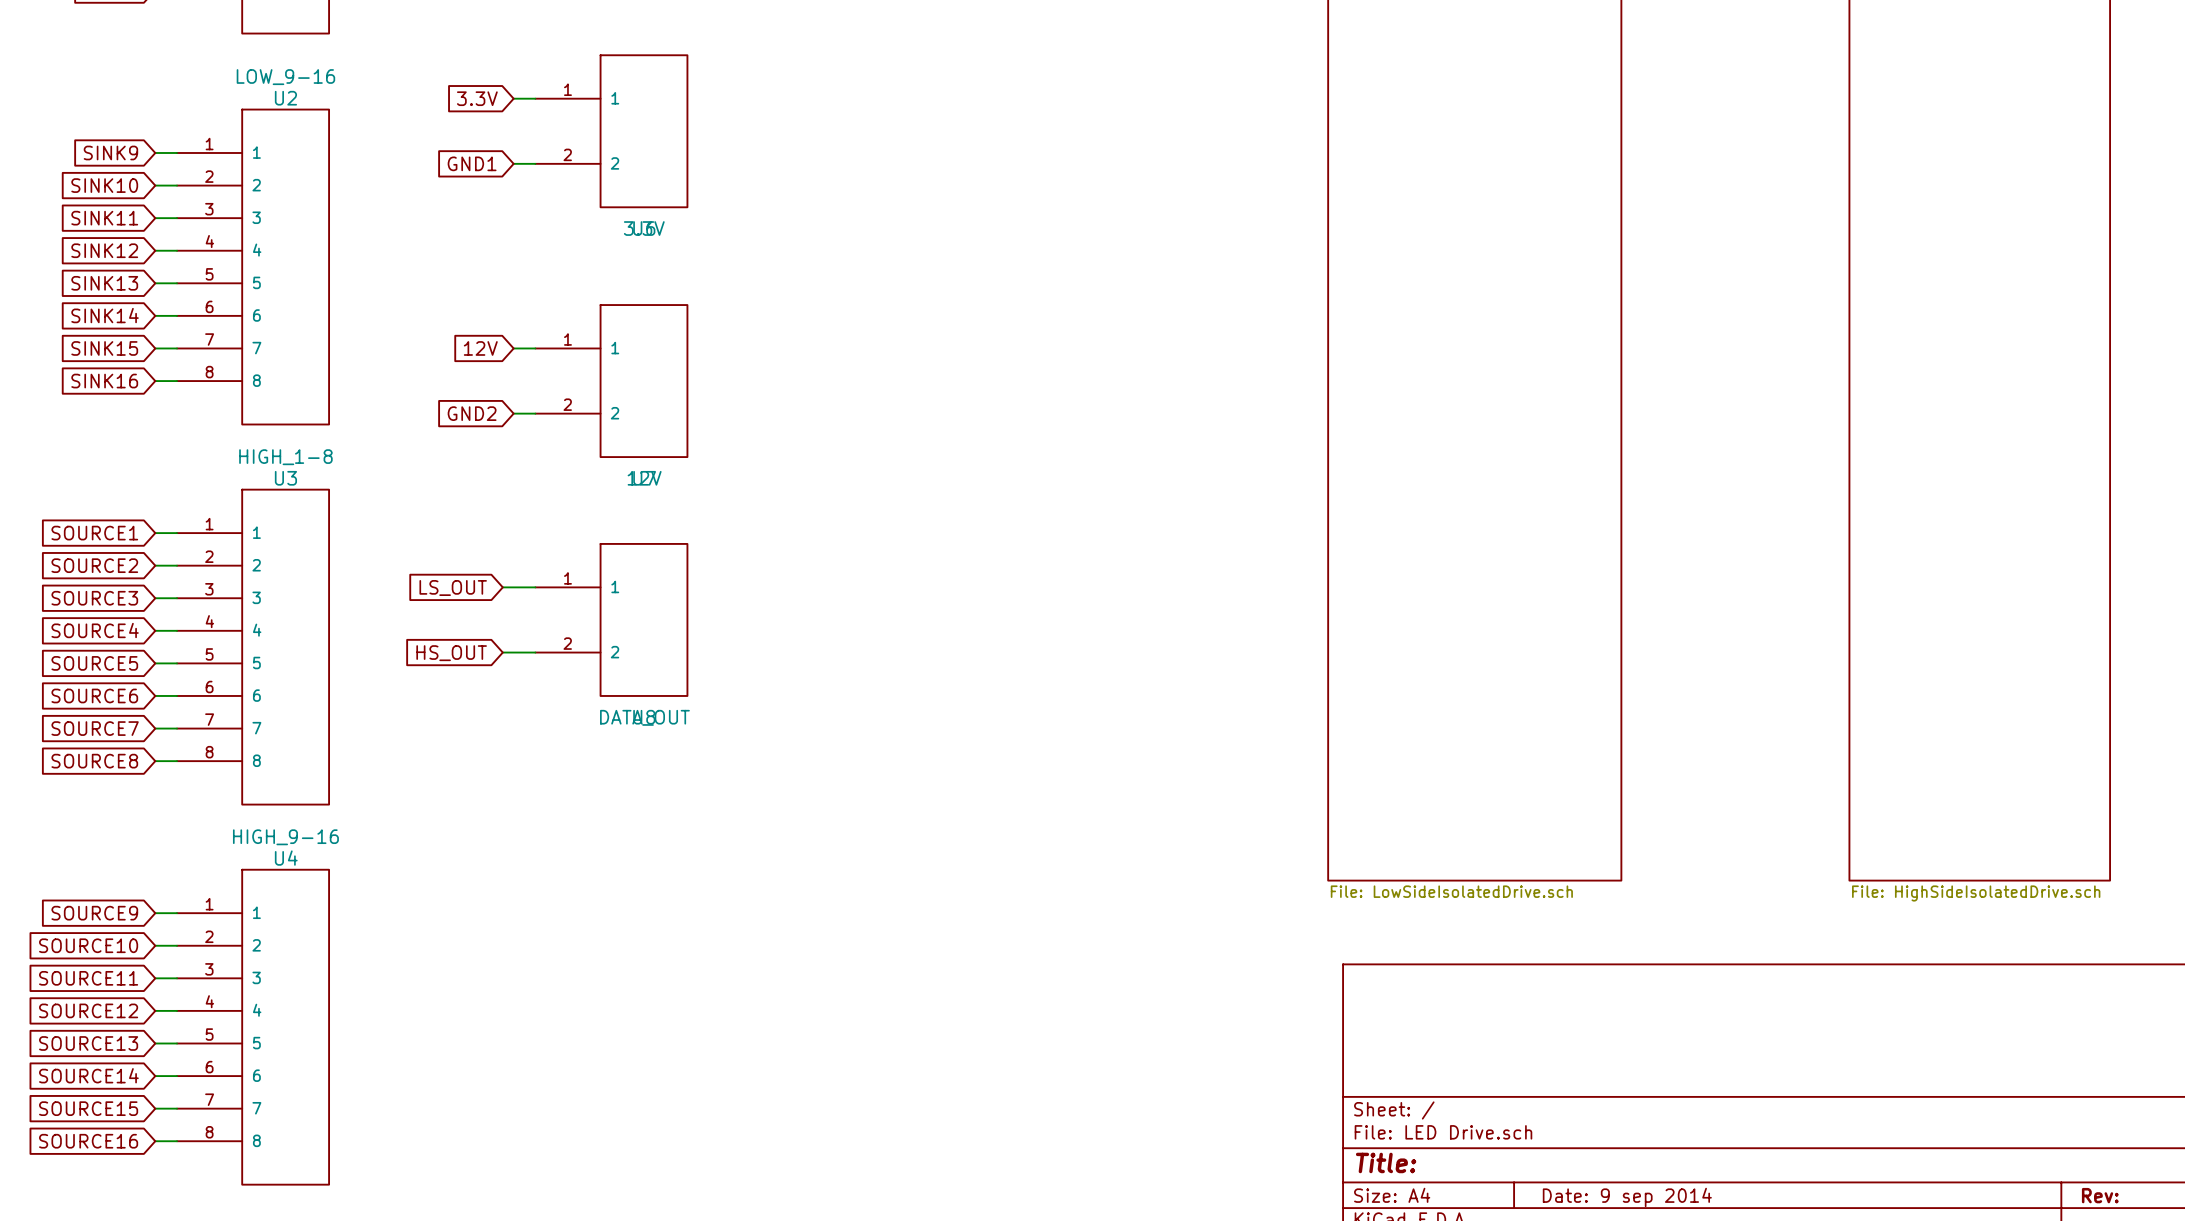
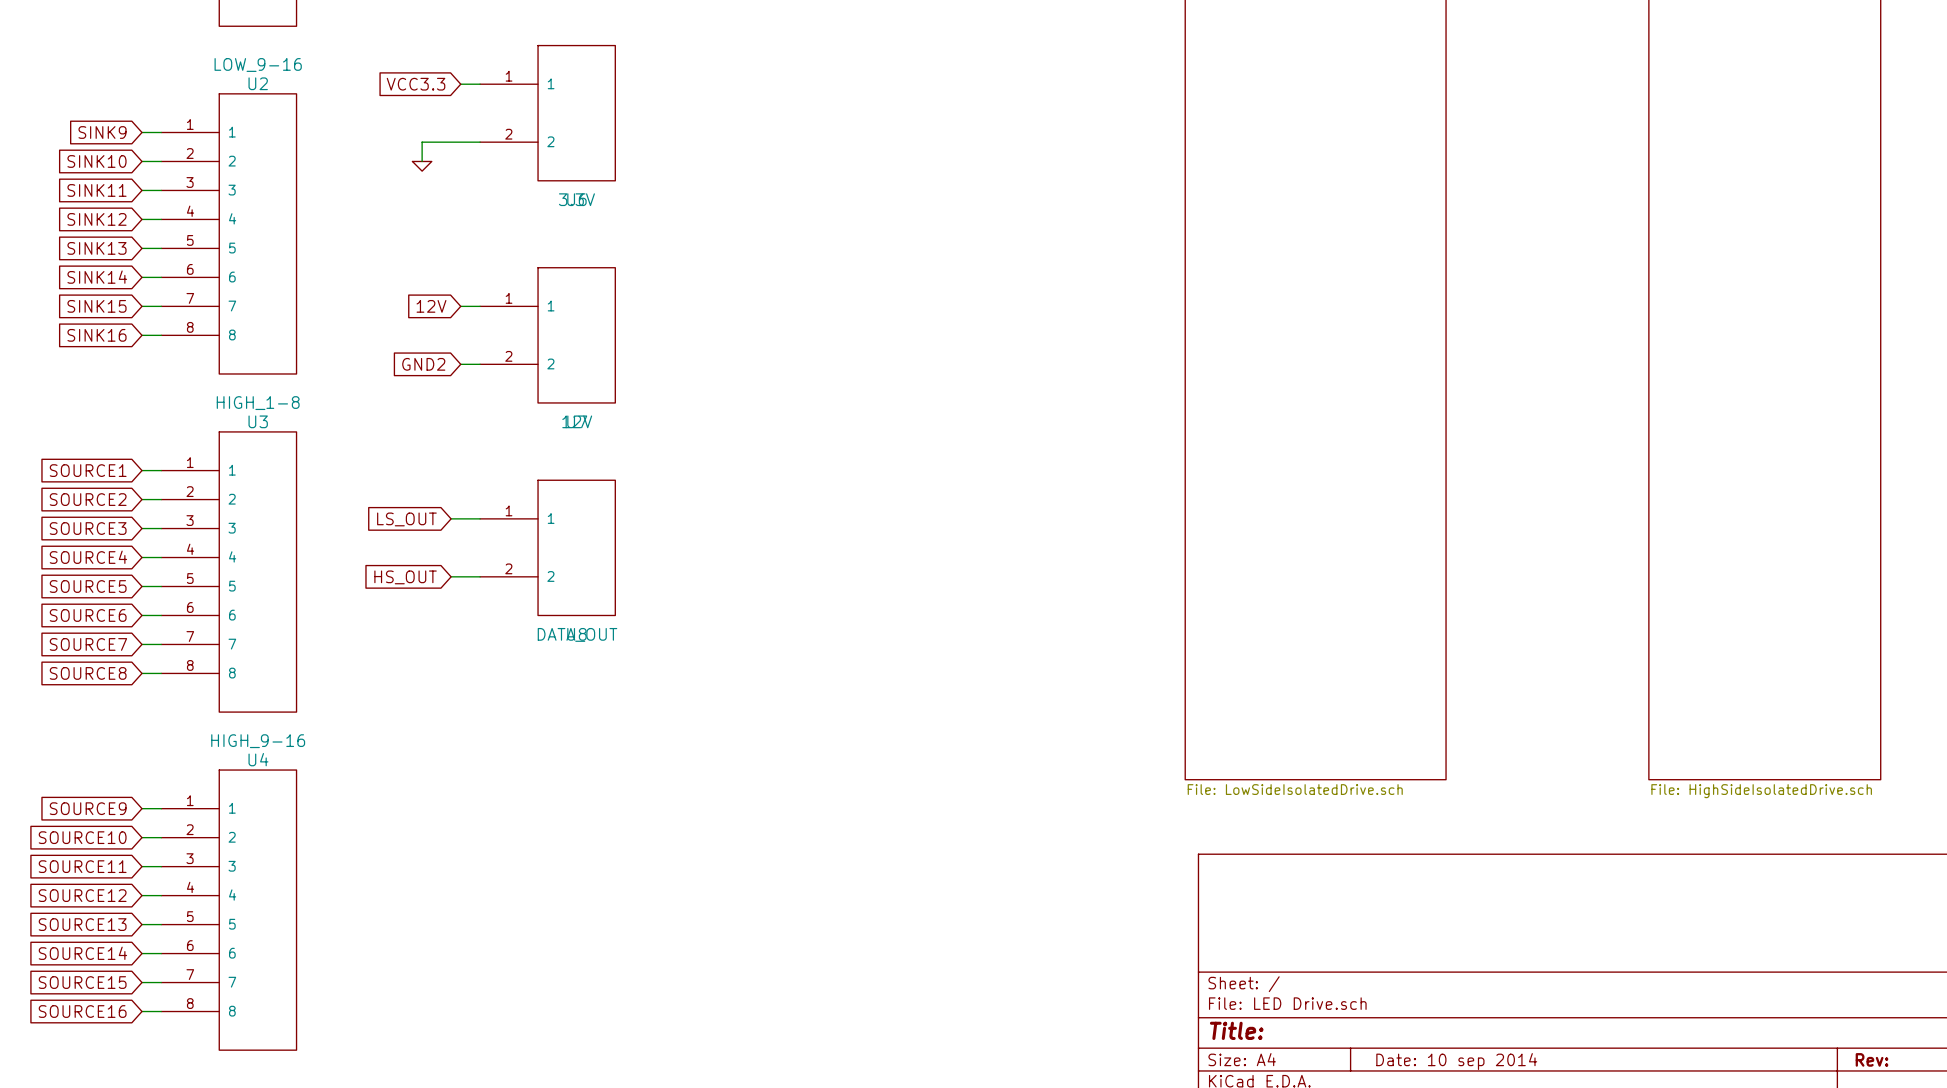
global label: 3.3V (477, 98) -> VCC3.3 (416, 84)
global label: GND1 (472, 163) -> none
wire: none -> (460, 142) (422, 142) (422, 161)
power symbol: none -> (422, 166)
title block: Date: 9 sep 2014 (1627, 1197) -> Date: 10 sep 2014 (1456, 1061)

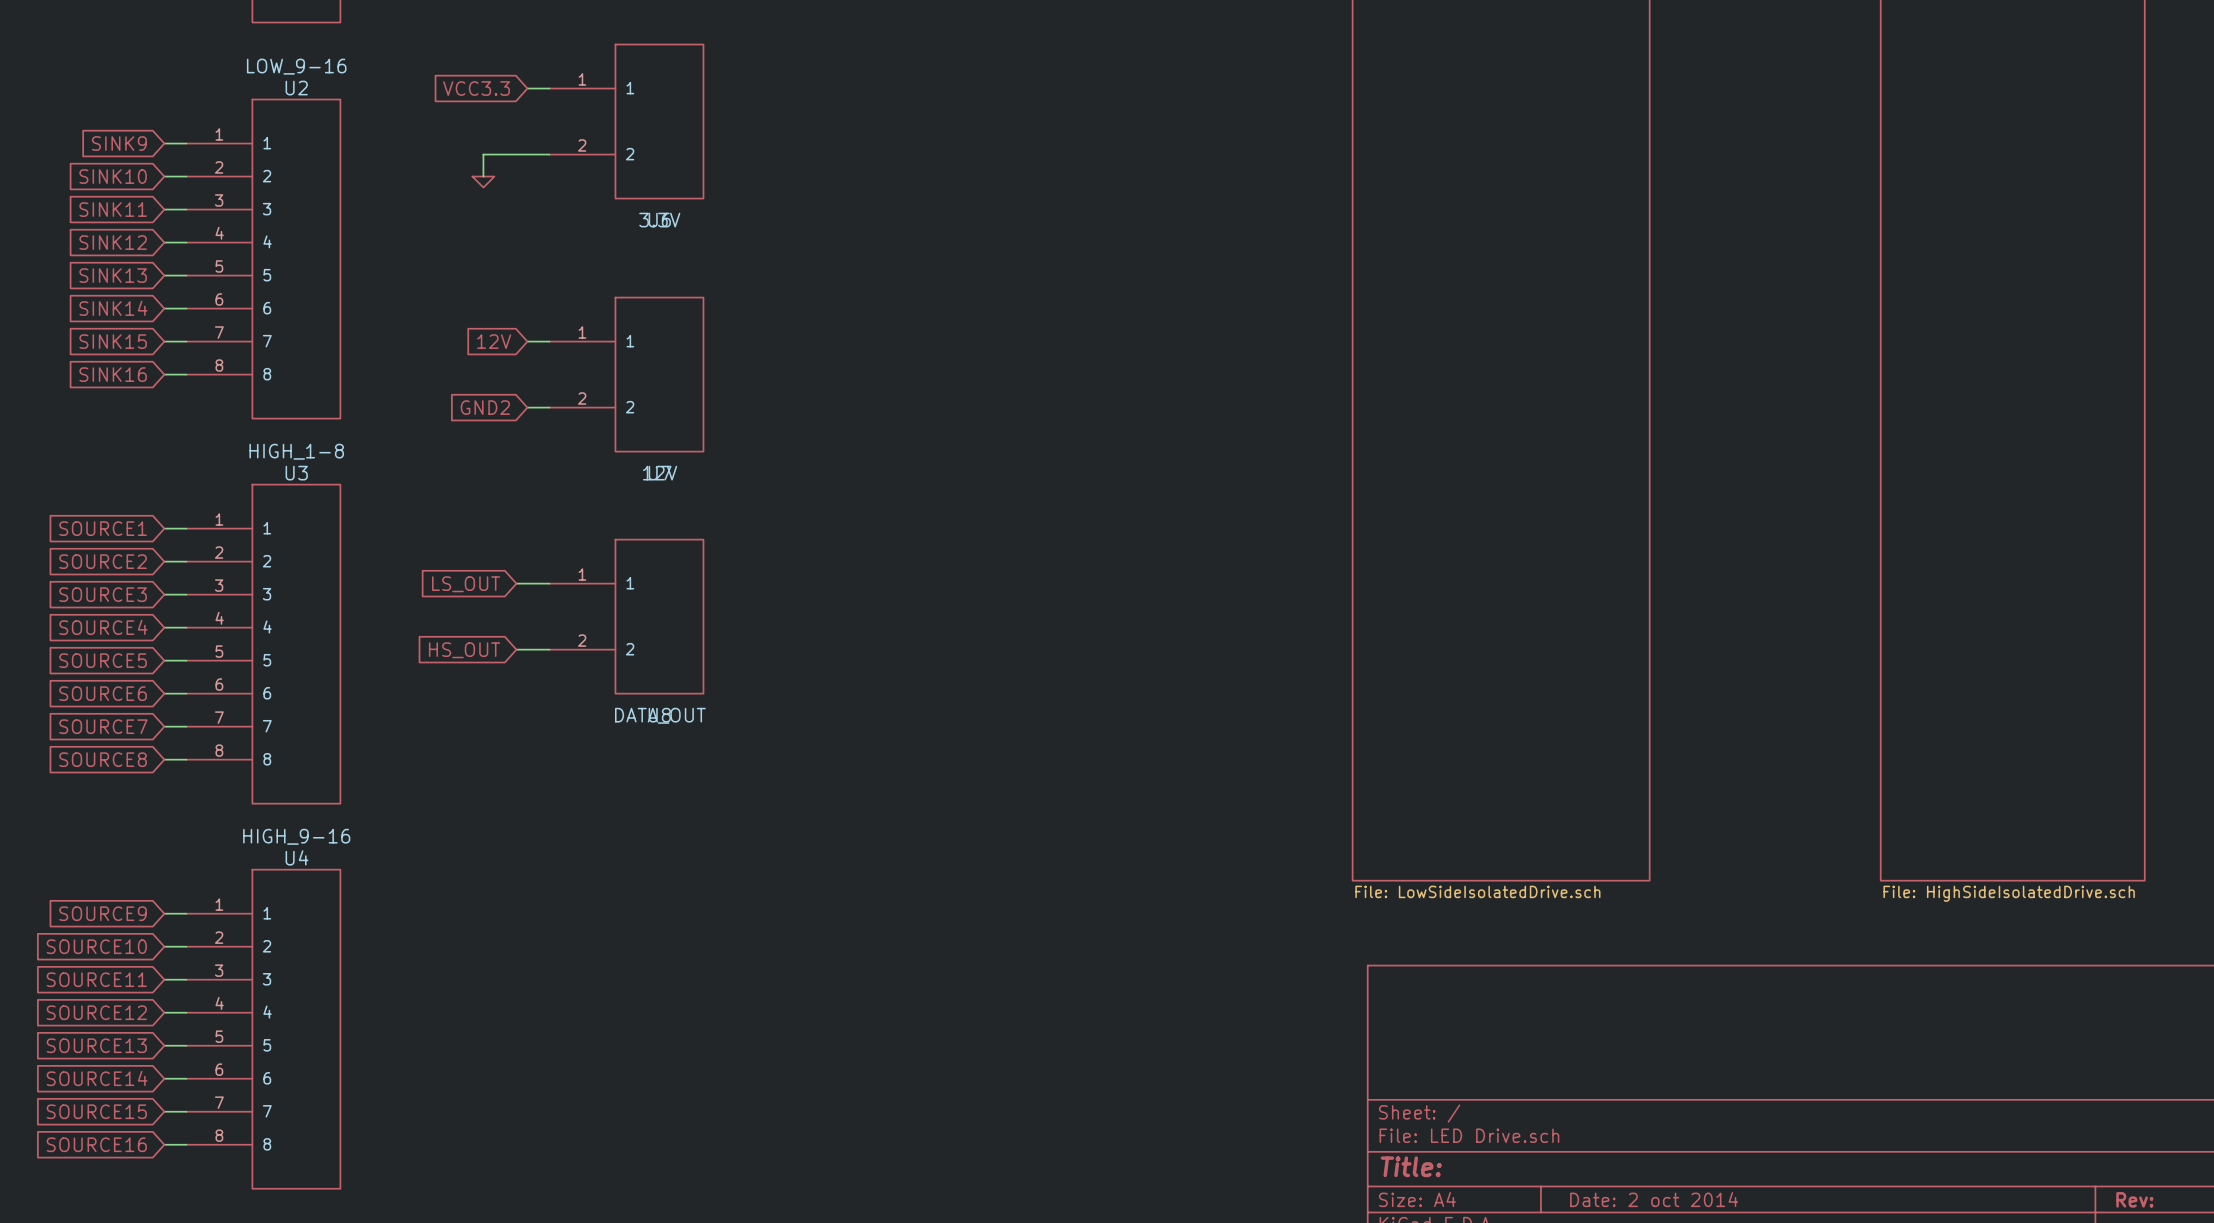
title block: Date: 10 sep 2014 (1456, 1061) -> Date: 2 oct 2014 (1654, 1199)

